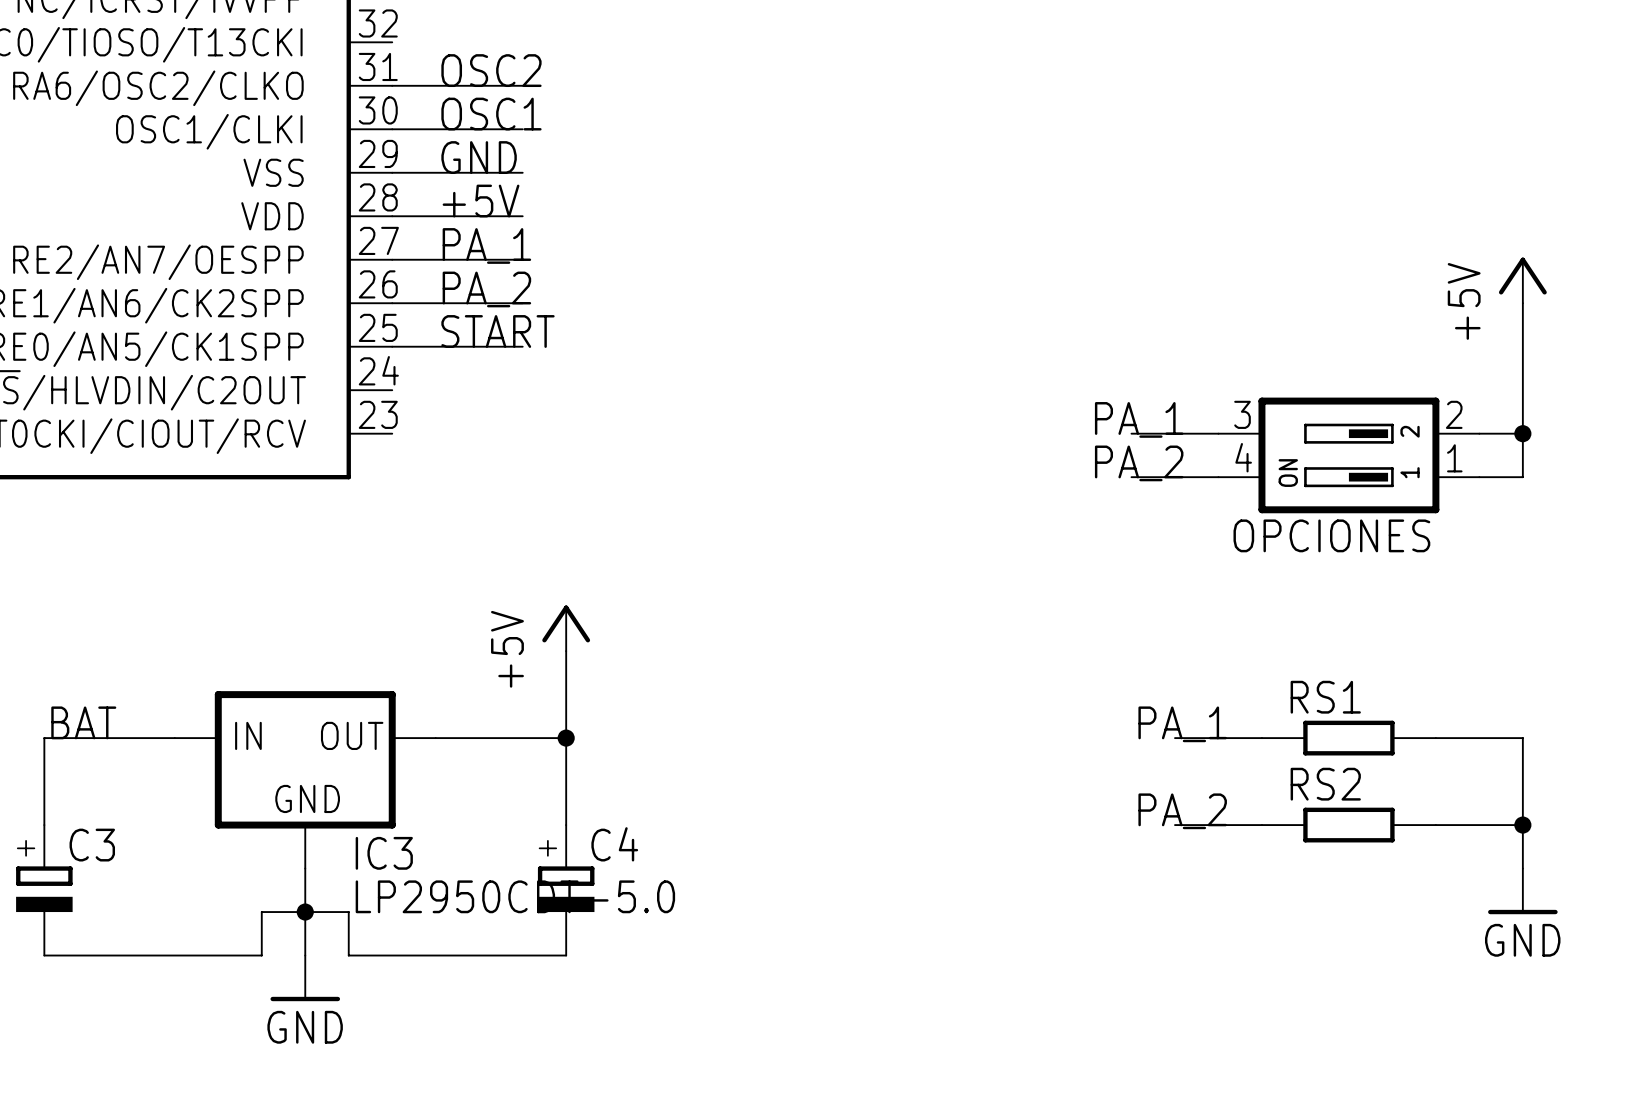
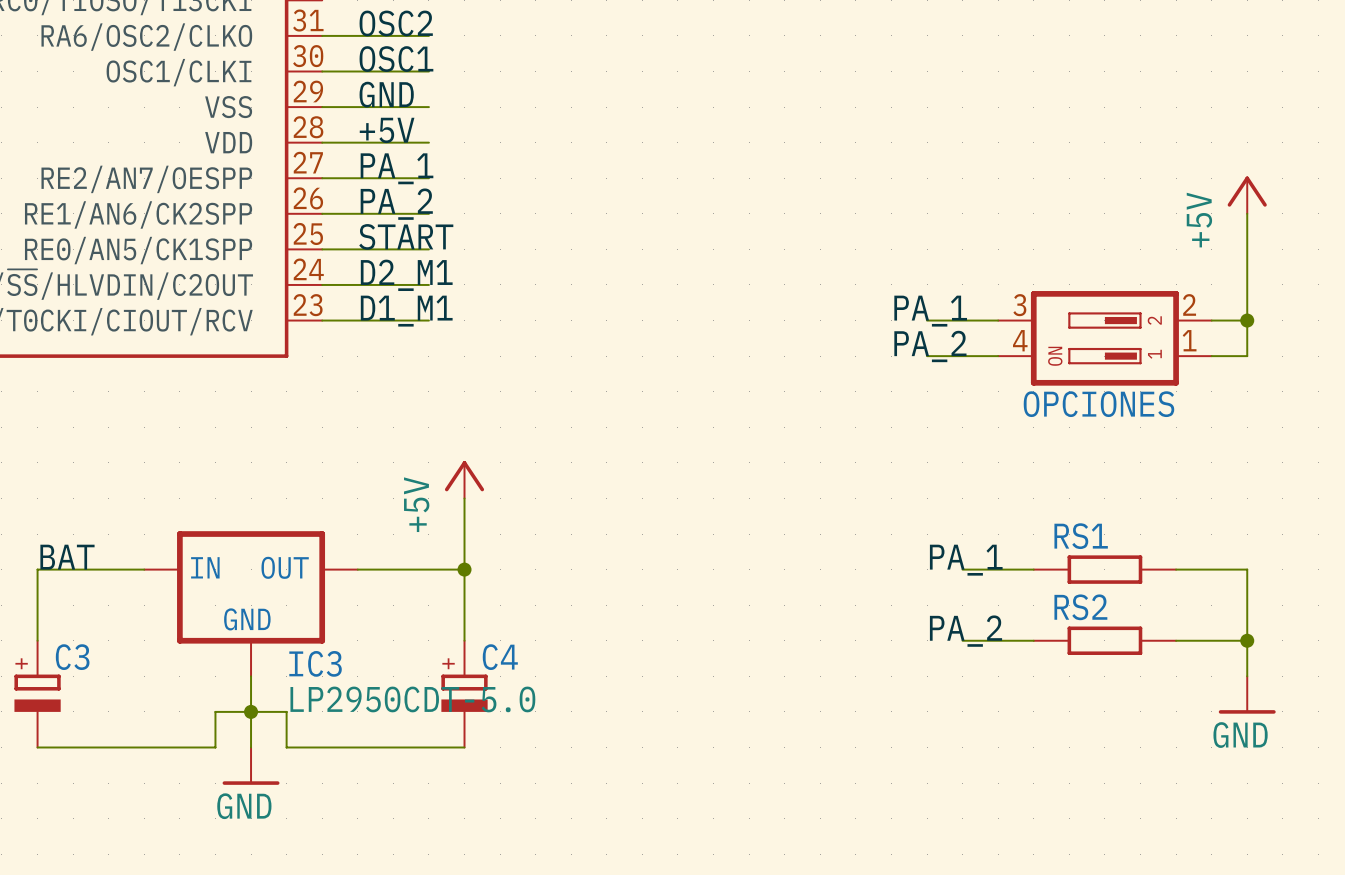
label: none -> D2_M1 (406, 275)
wire: none -> (322, 284) (428, 284)
label: none -> D1_M1 (406, 311)
wire: none -> (322, 320) (428, 320)

